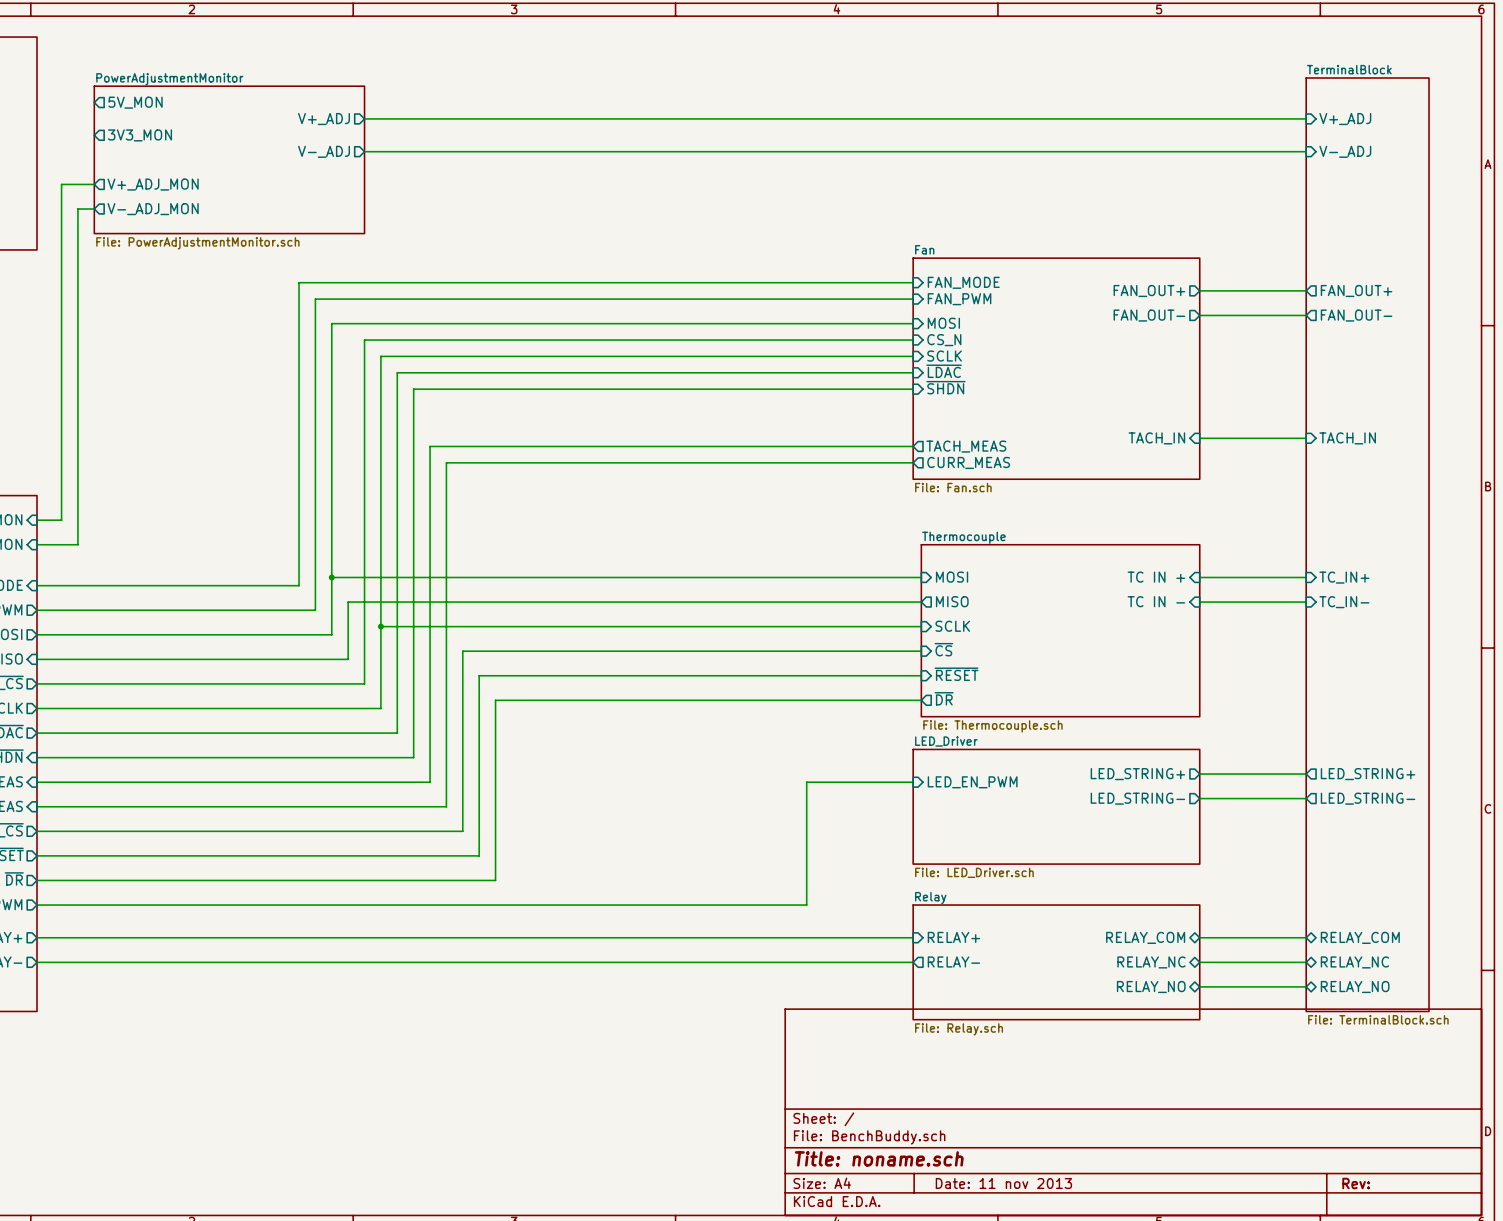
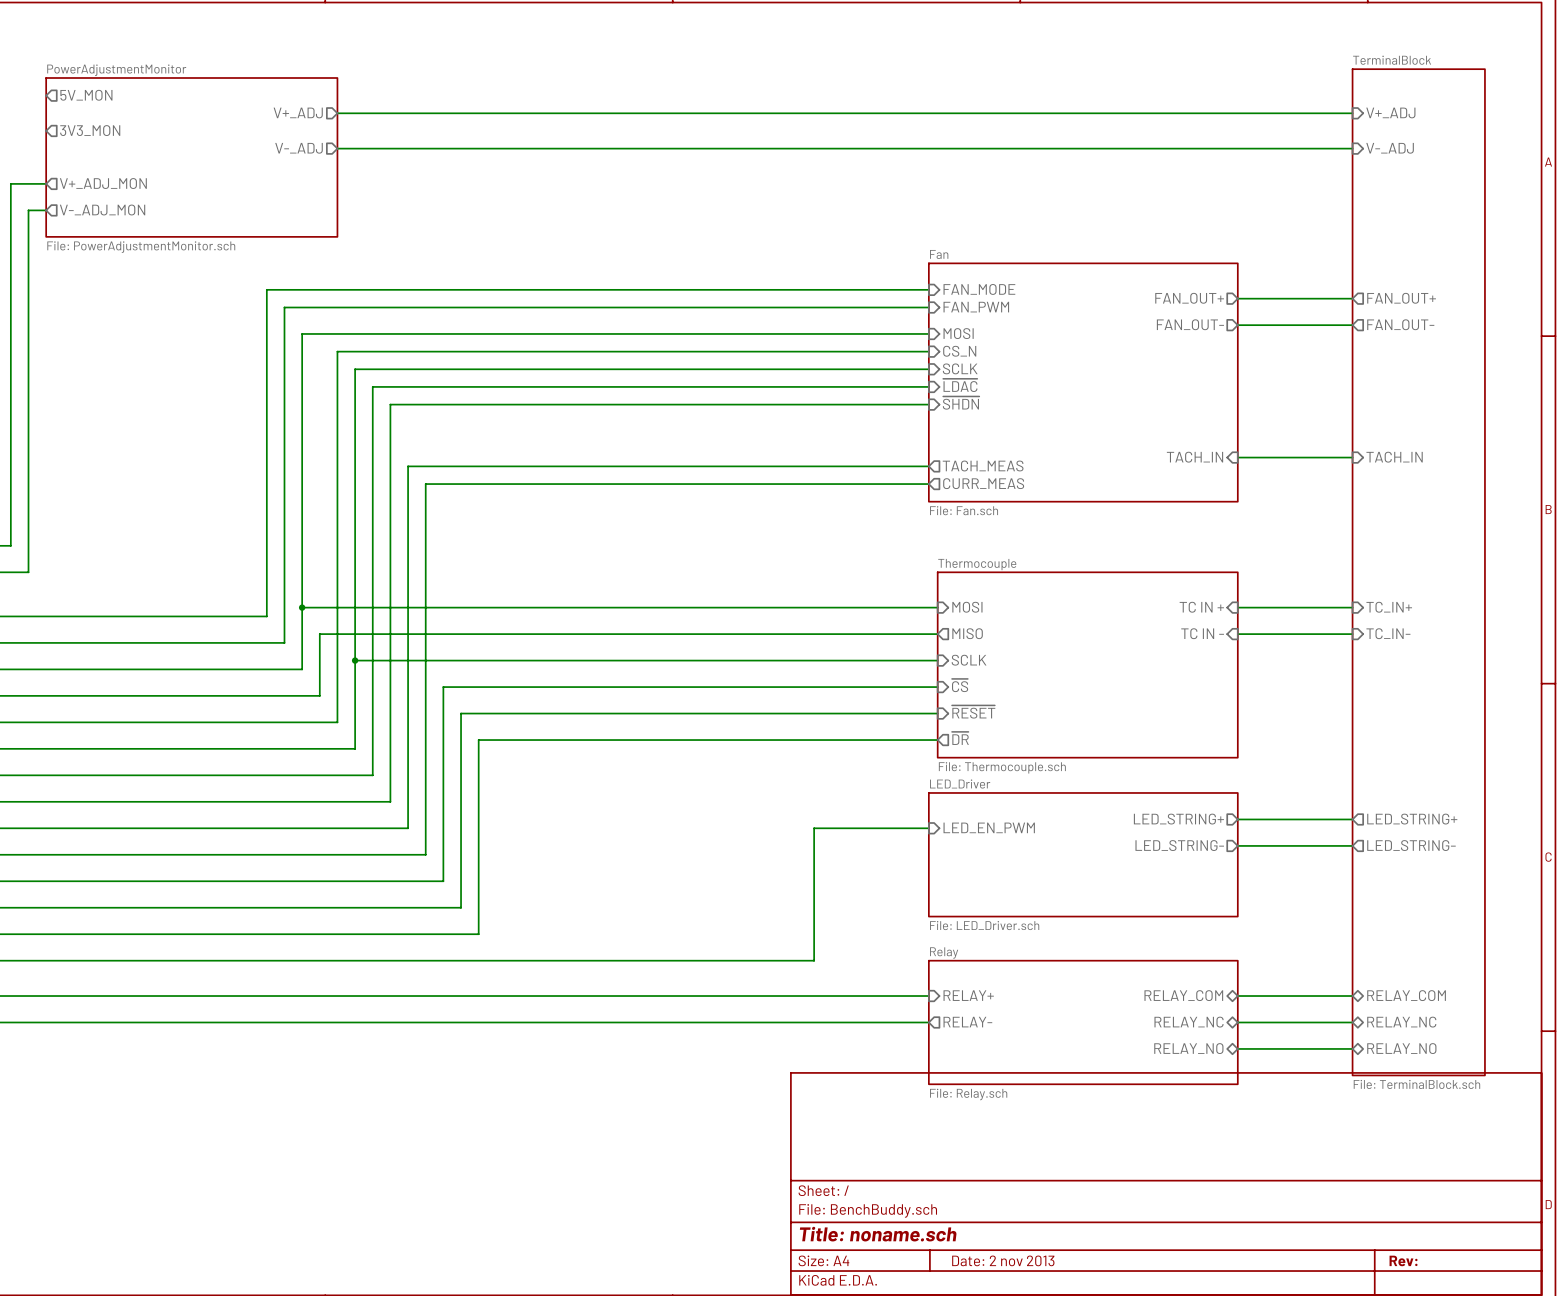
title block: Date: 11 nov 2013 (1003, 1183) -> Date: 2 nov 2013 (1003, 1260)

